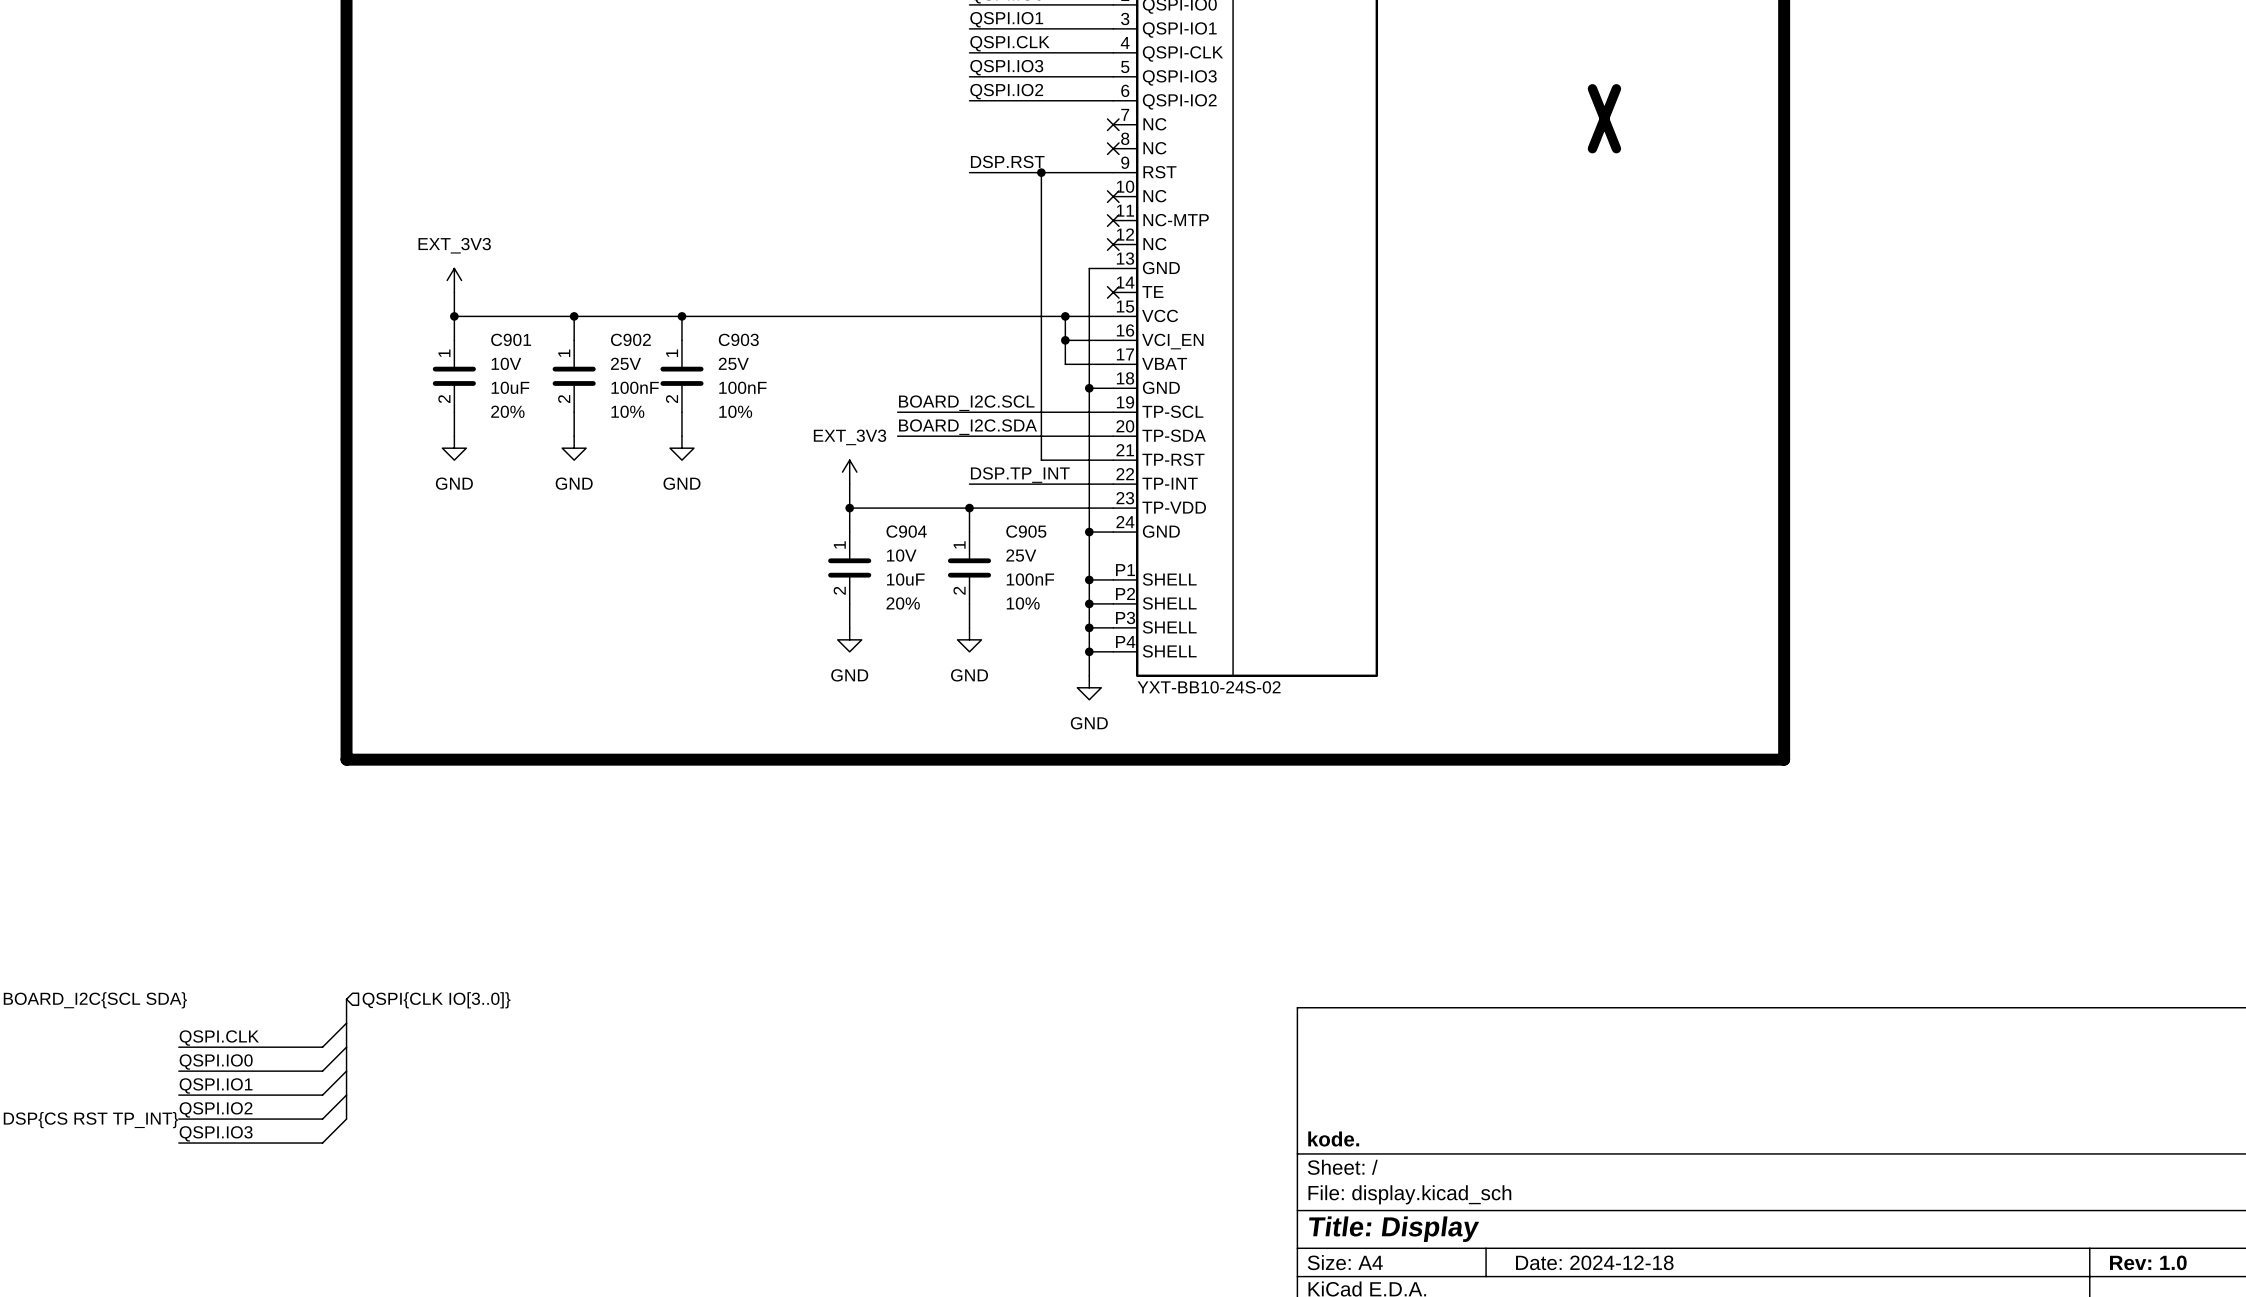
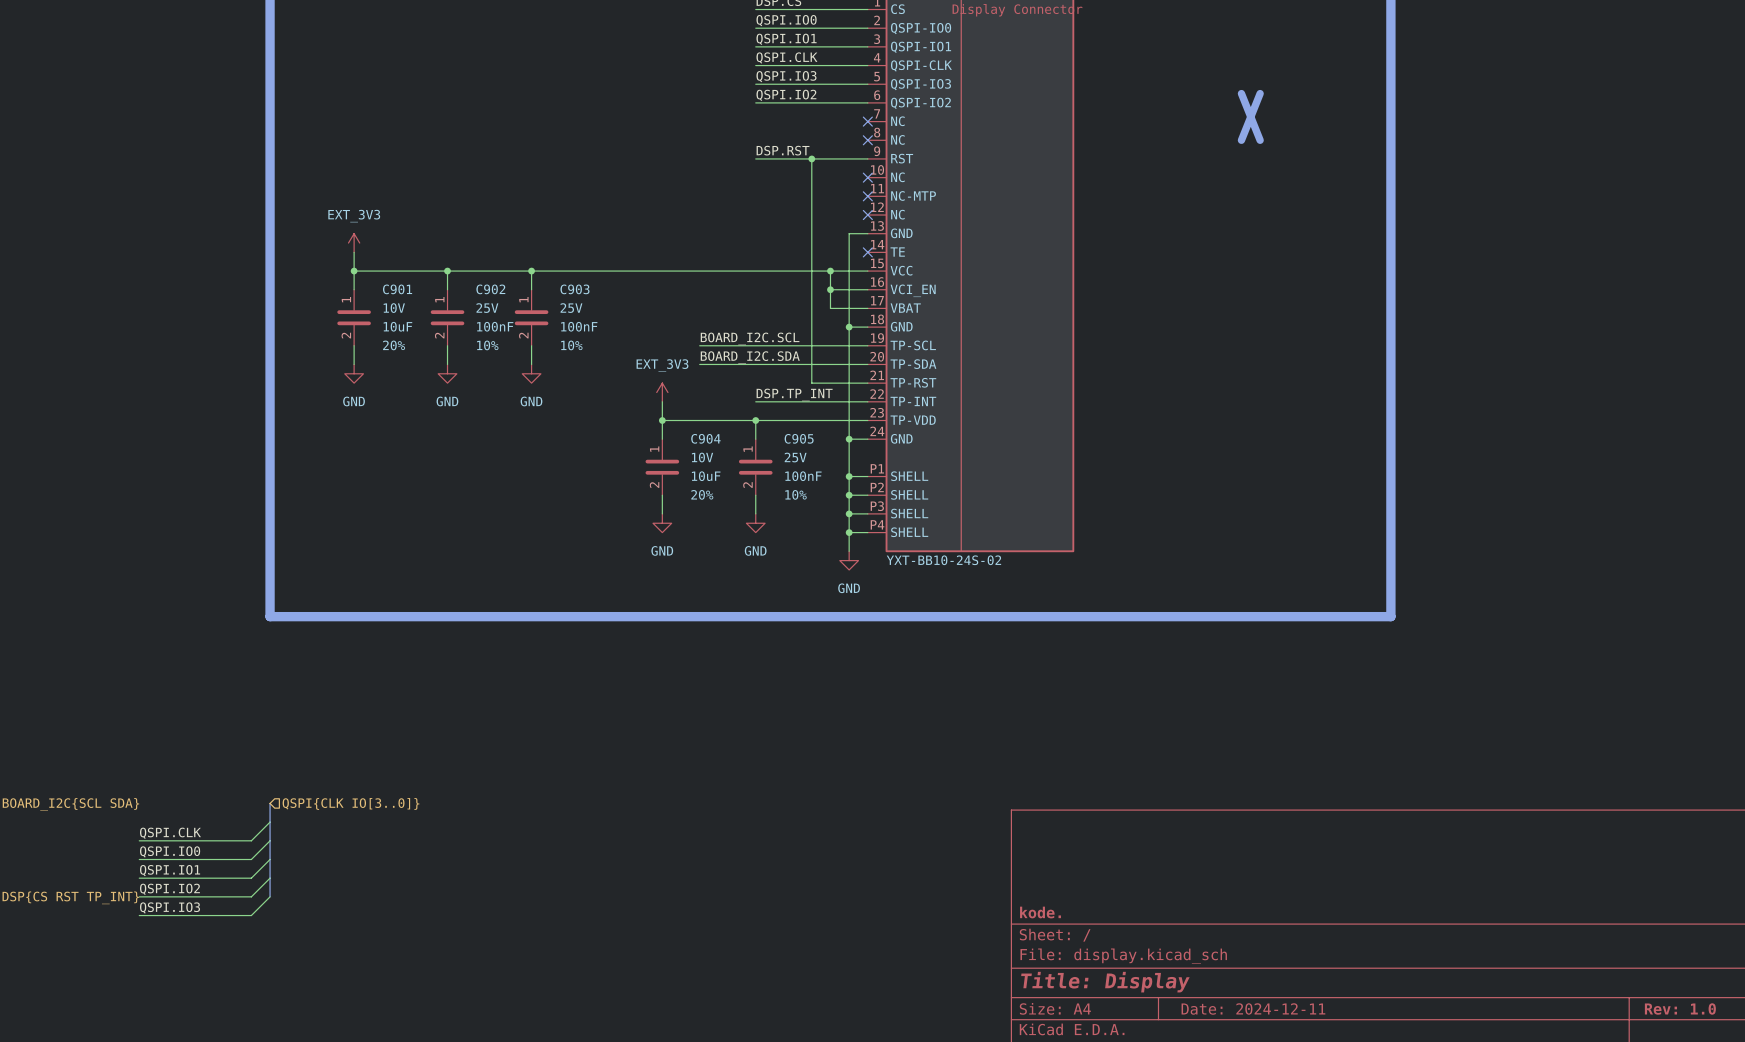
title block: Date: 2024-12-18 (1594, 1262) -> Date: 2024-12-11 (1253, 1008)

